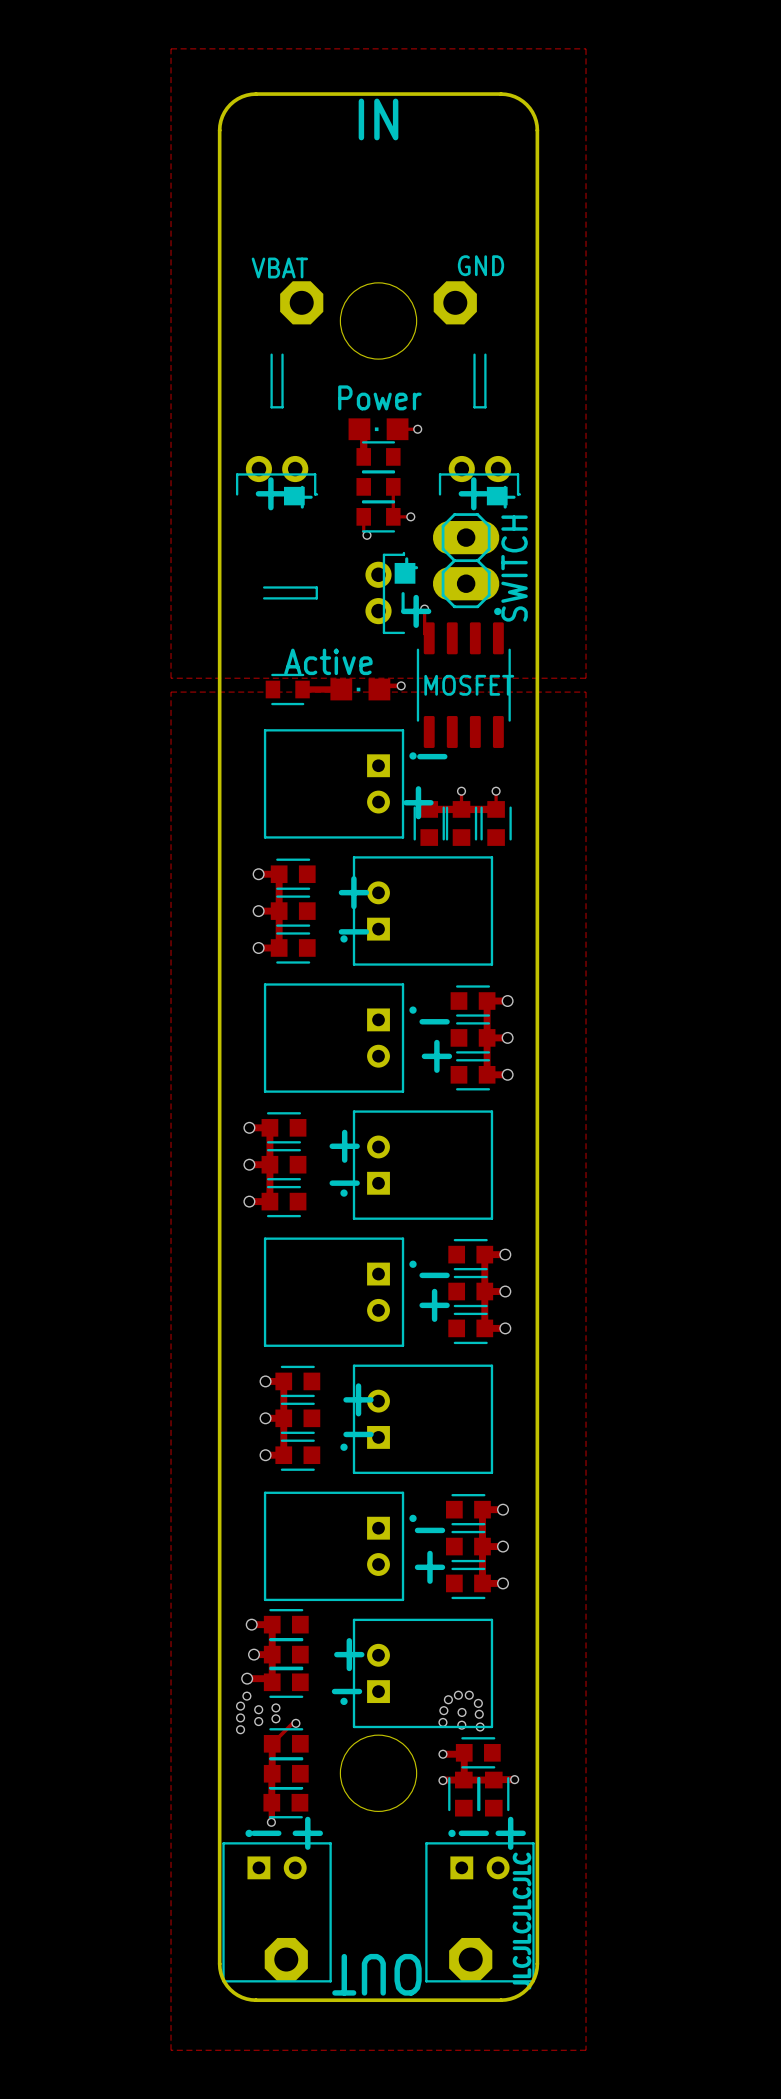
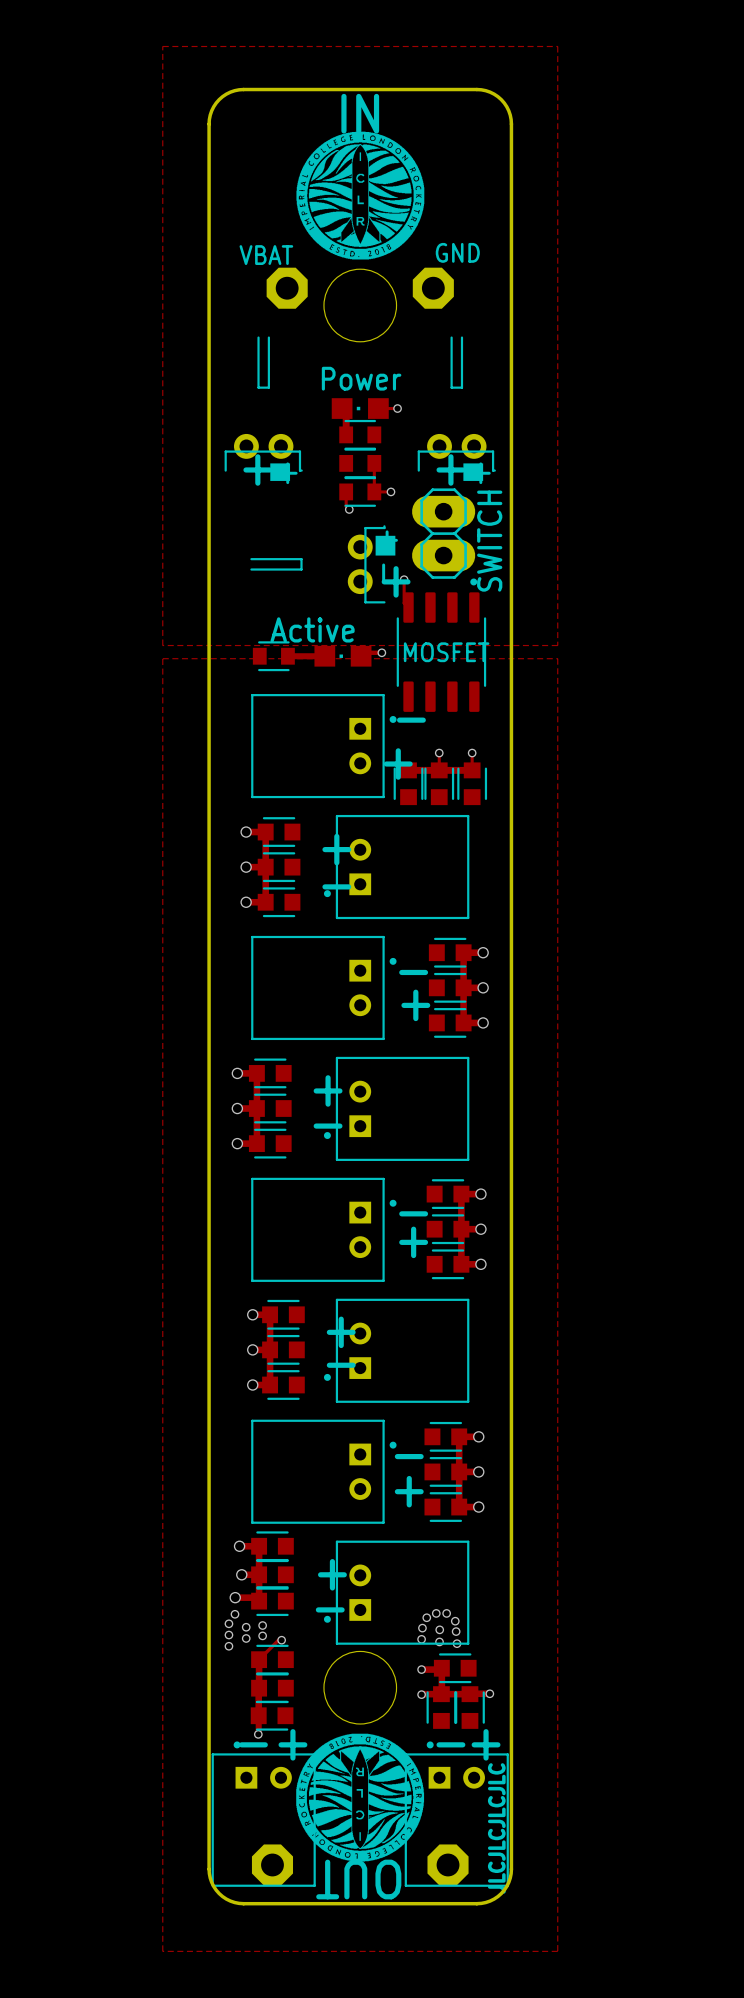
drawing: none -> [296, 131, 425, 260]
drawing: none -> [296, 1733, 425, 1862]

